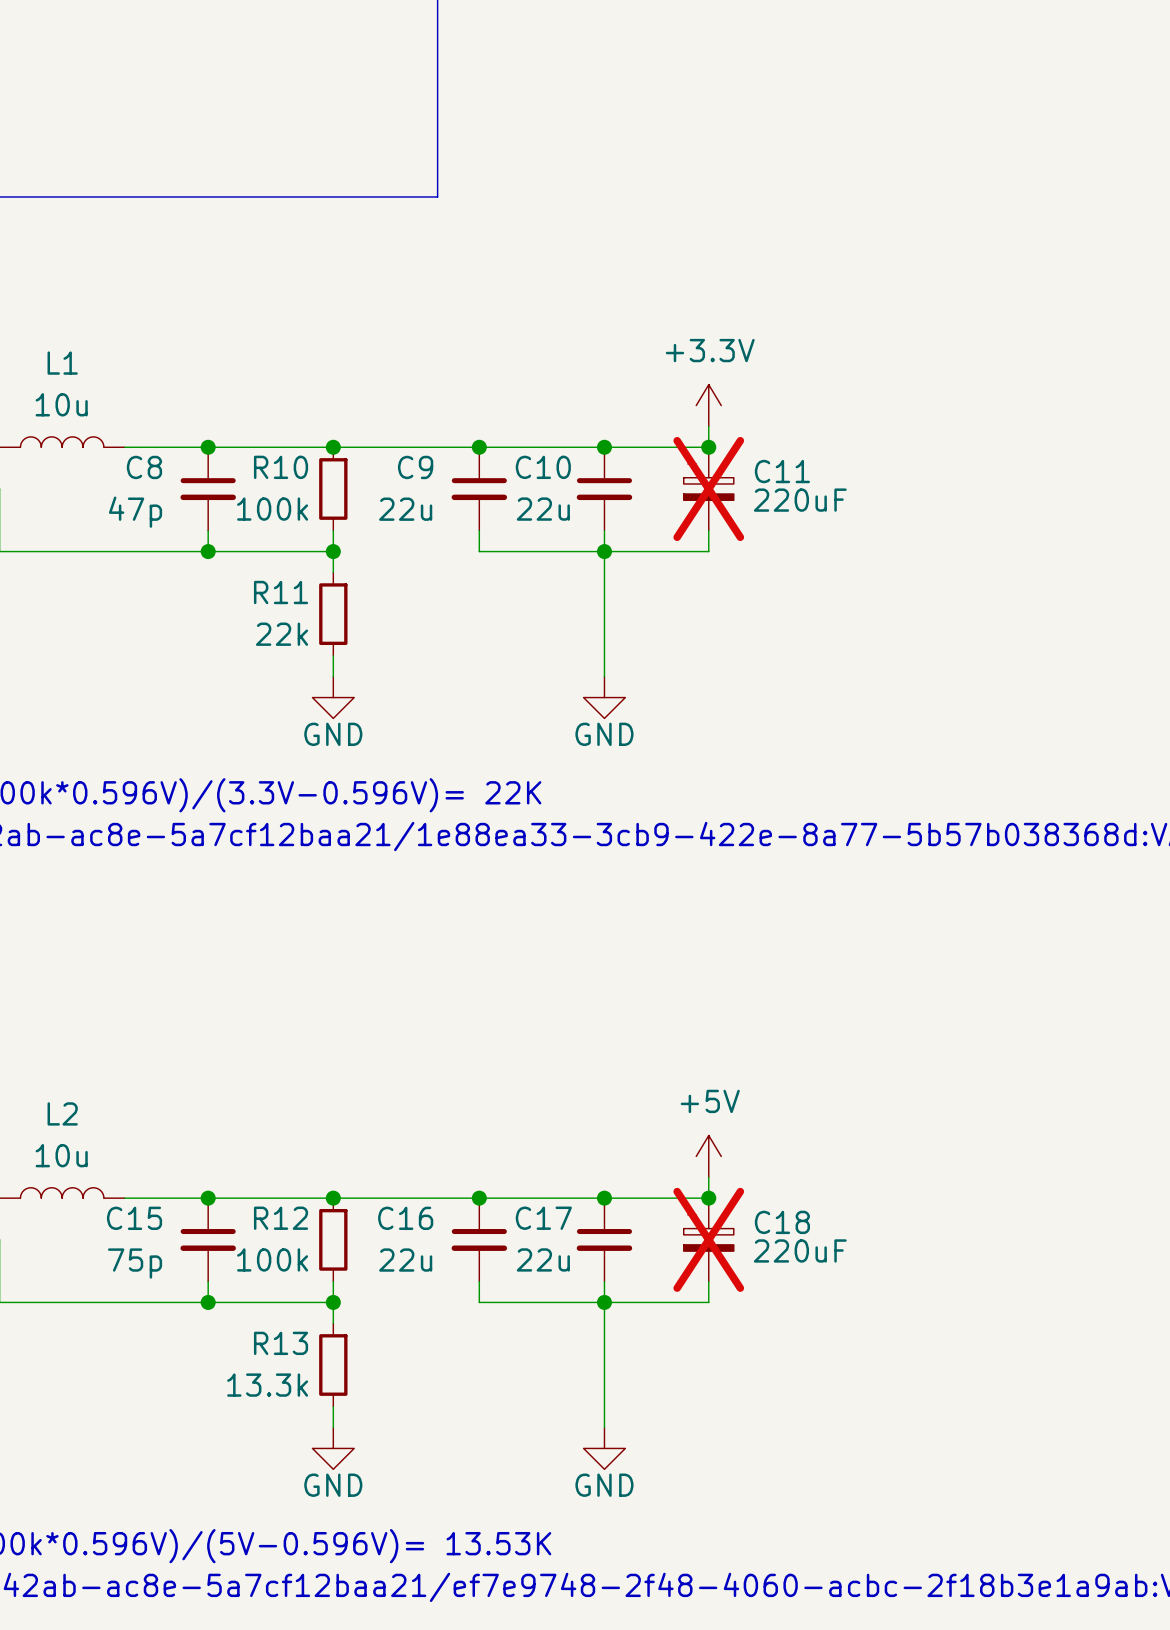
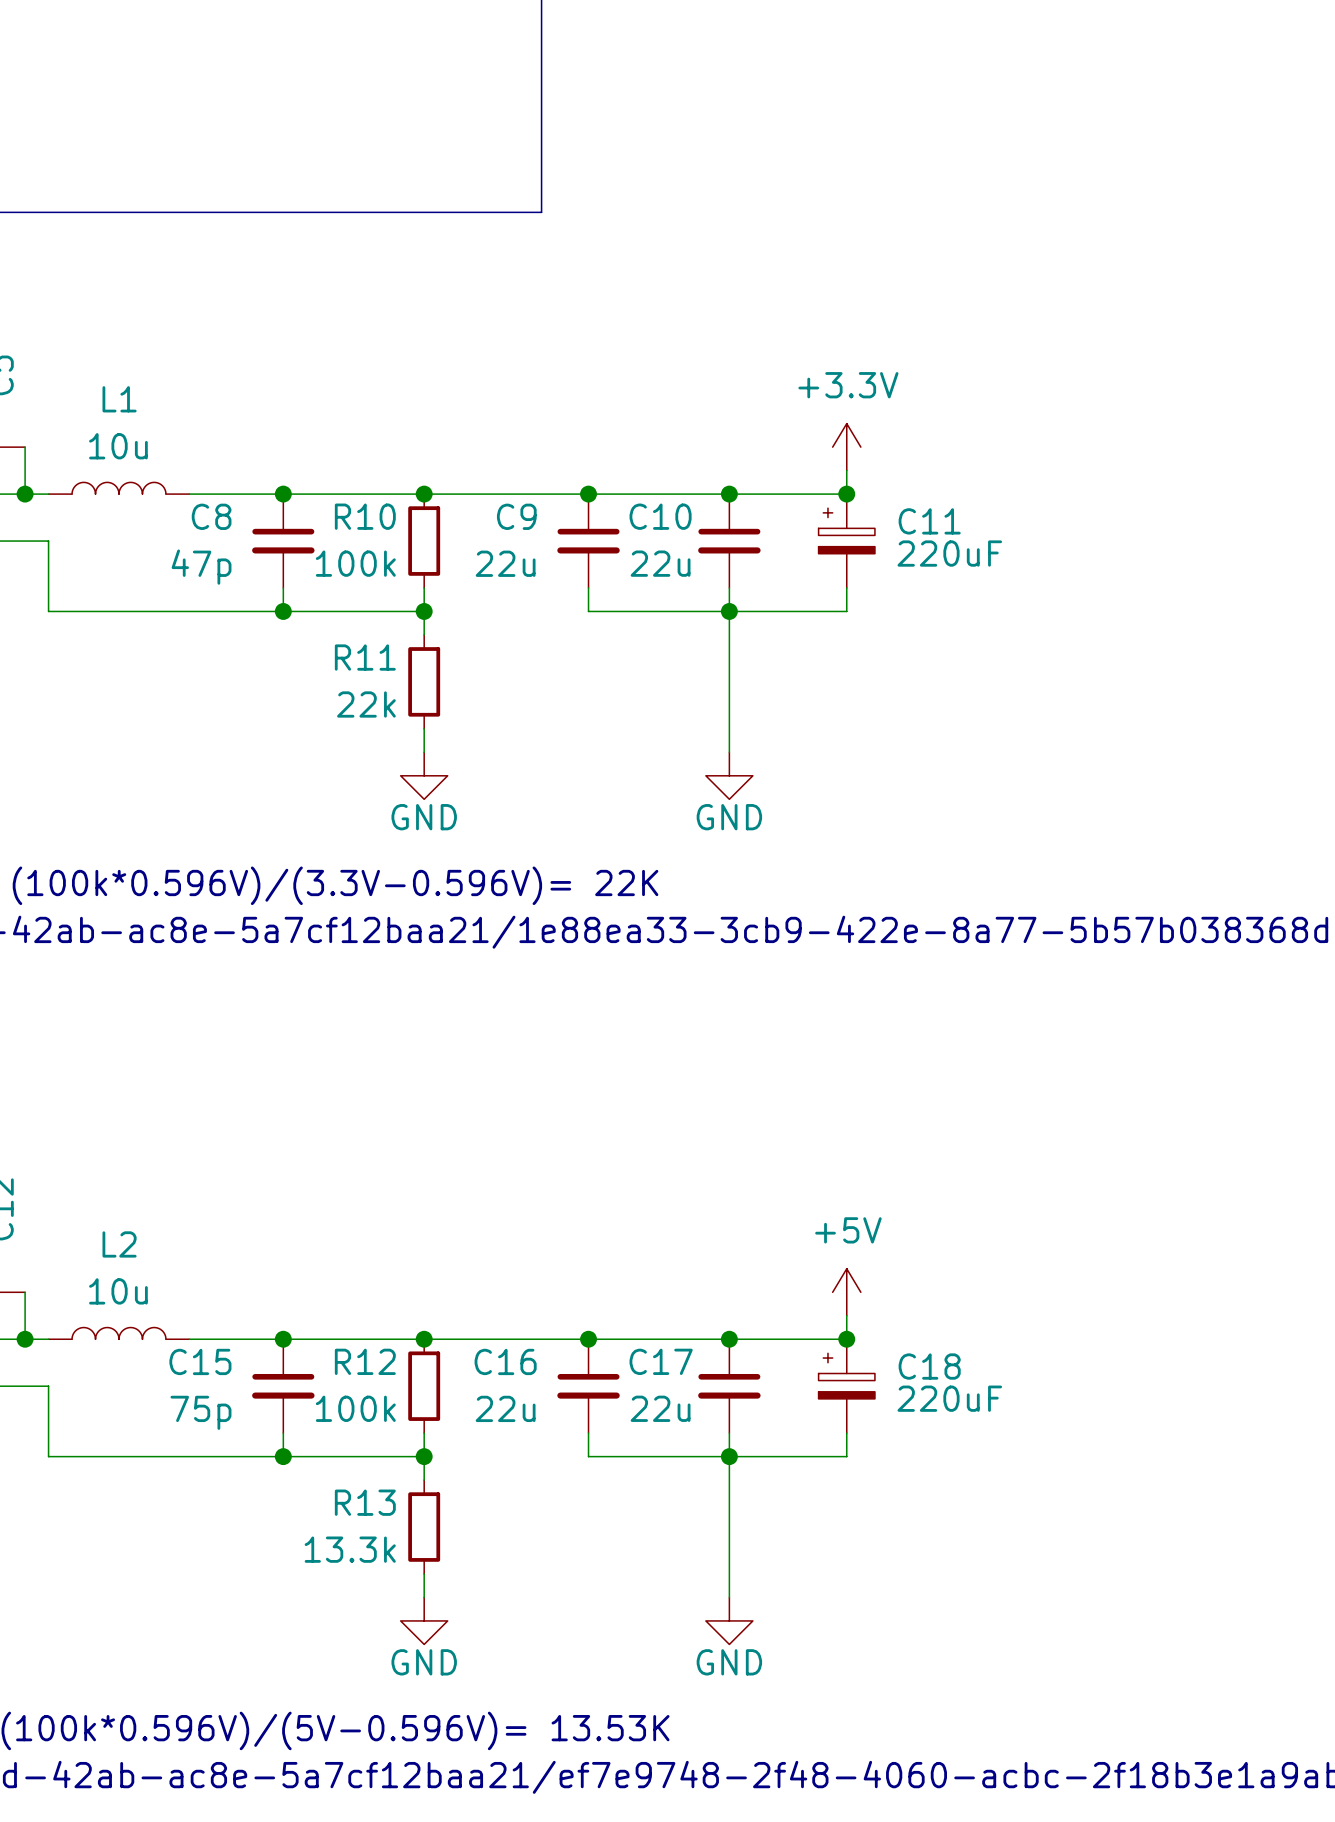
C11 do-not-place cross: (708, 488) -> none
C18 do-not-place cross: (708, 1239) -> none

